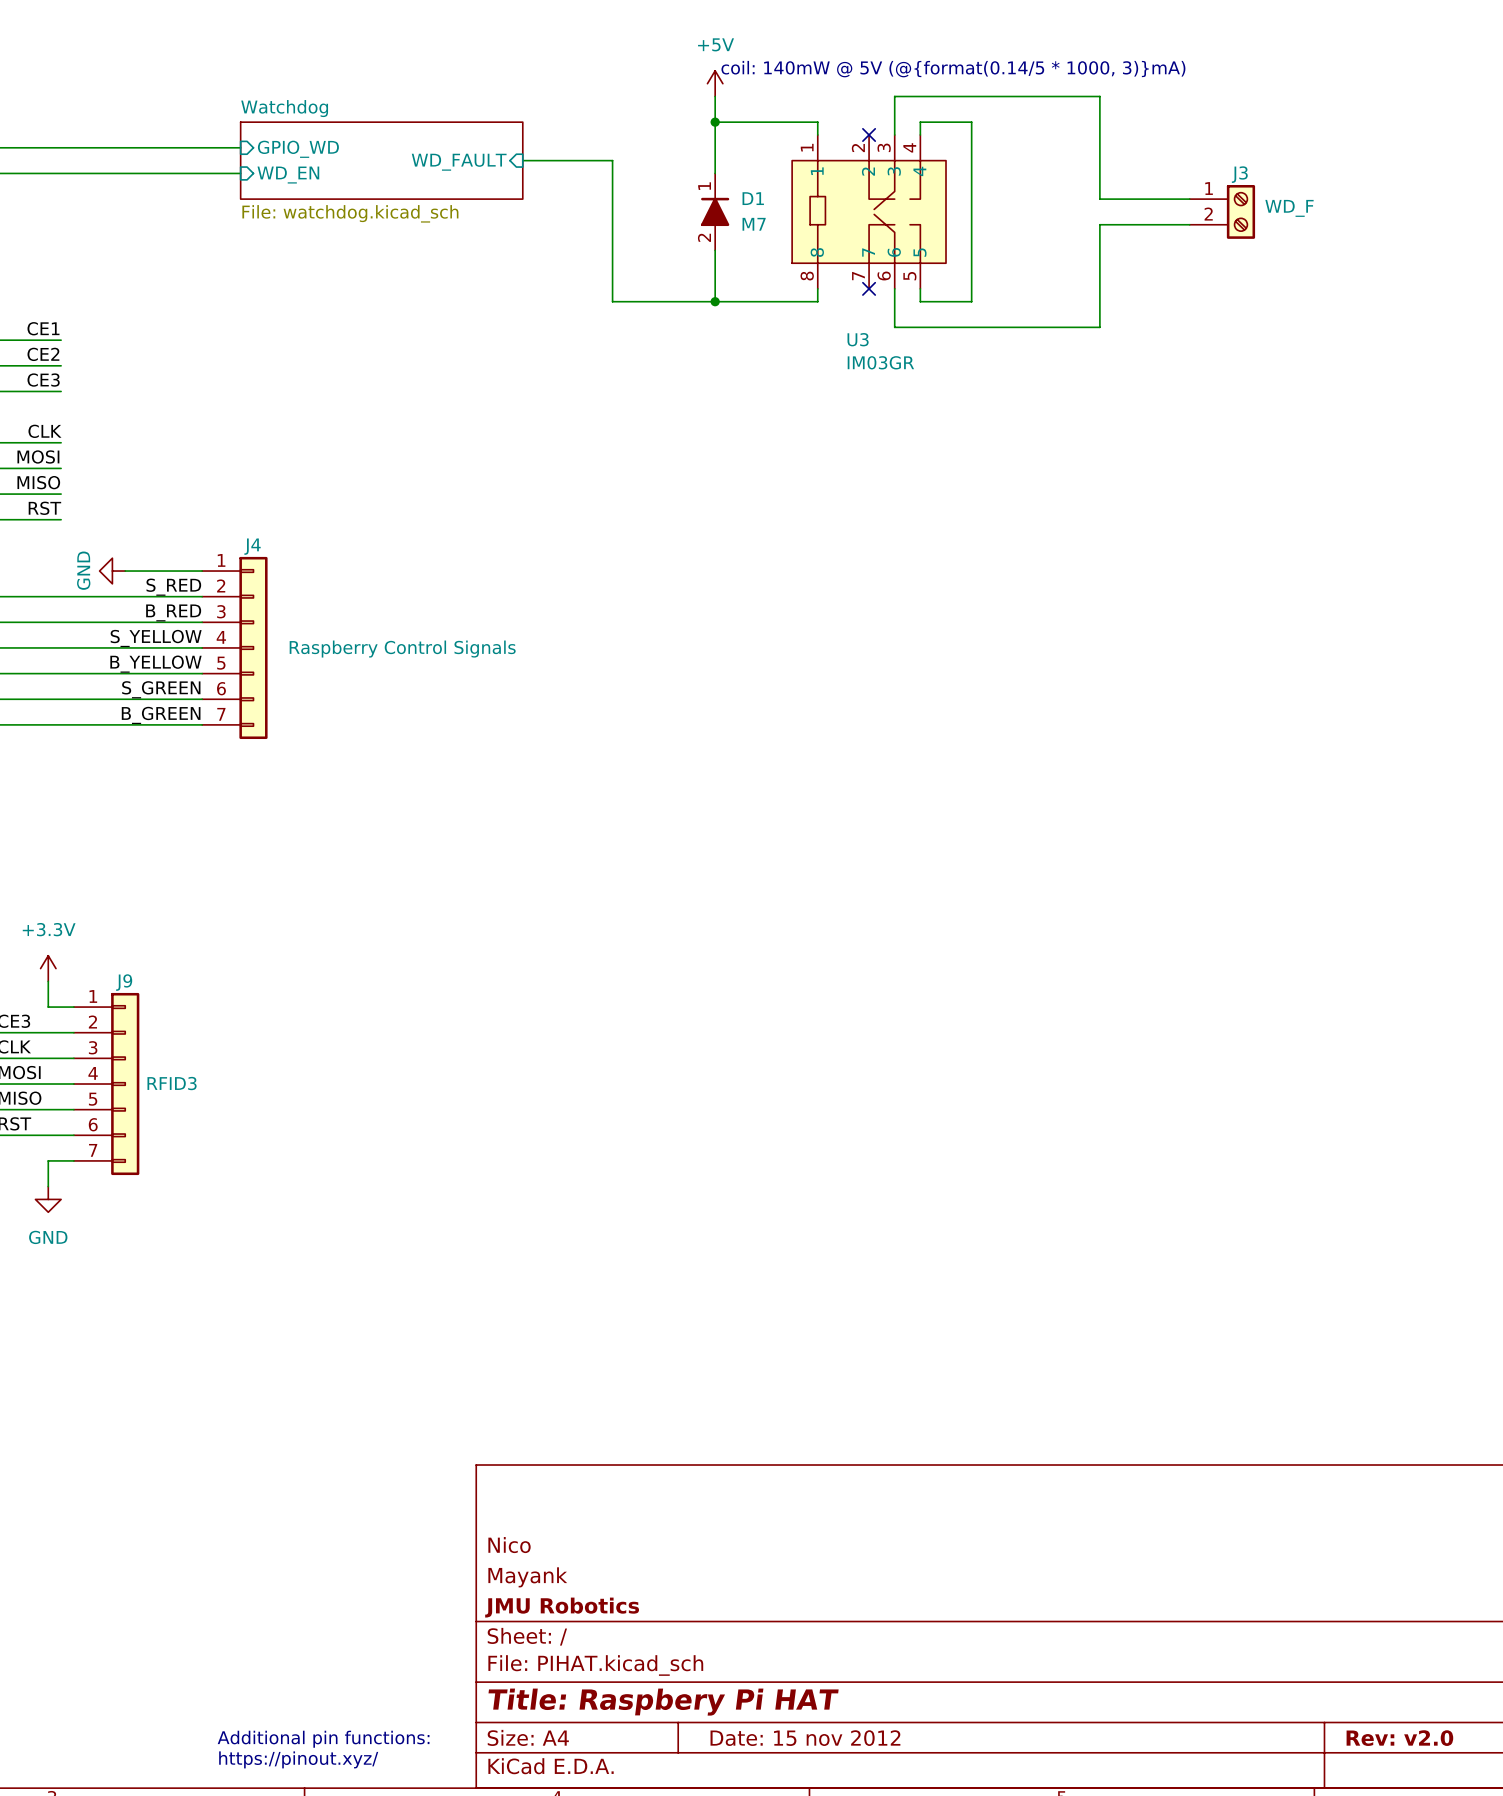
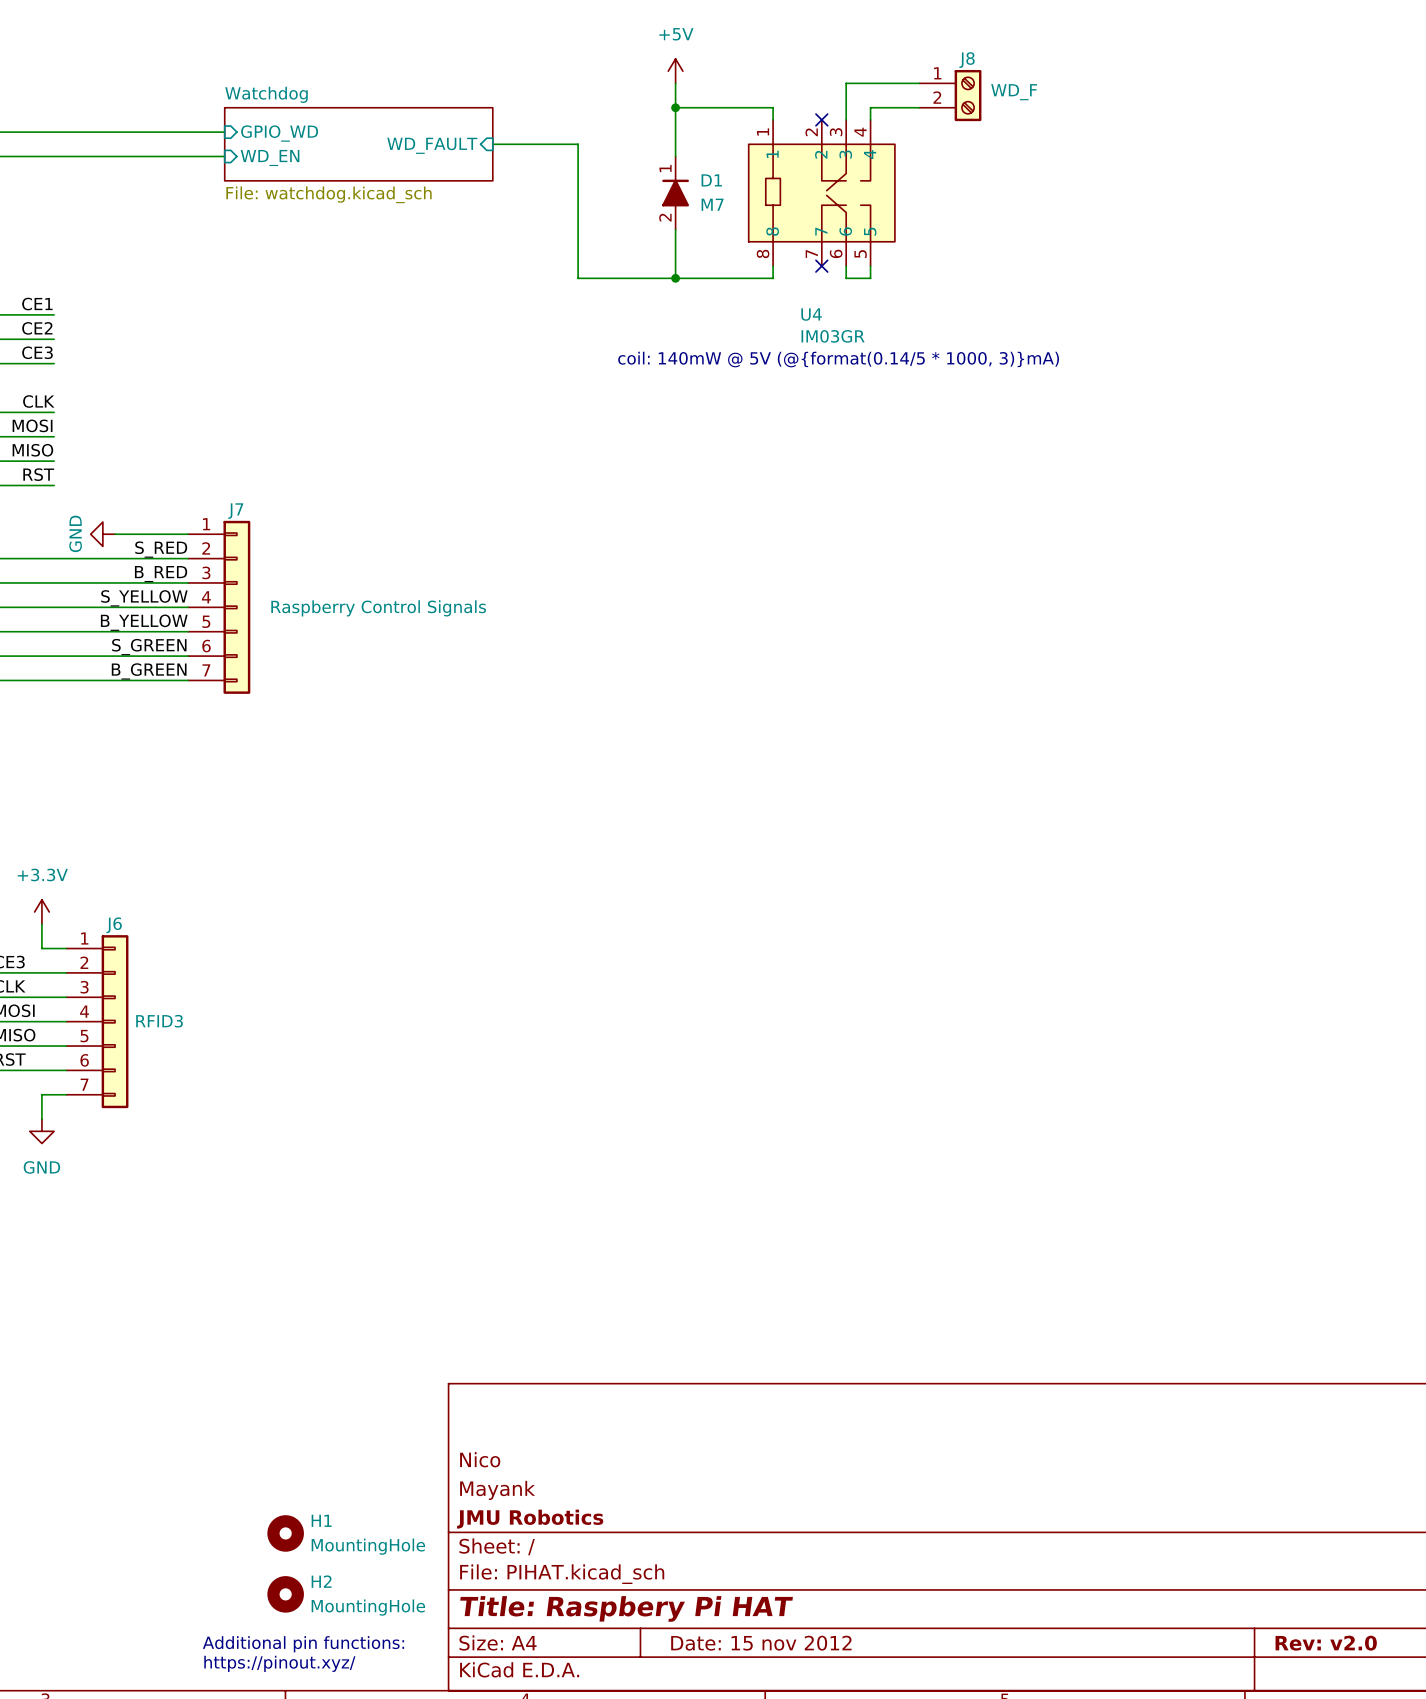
text: coil: 140mW @ 5V (@{format(0.14/5 * 1000, 3)}mA) (953, 69) -> none
wire: (971, 96) (1099, 96) (1099, 199) (1189, 199) -> none
J8: none -> WD_F (950, 95)
wire: (971, 122) (971, 301) (920, 301) -> (846, 278) (870, 278)
J3: WD_F (1222, 211) -> none
wire: (1189, 224) (1099, 224) (1099, 327) (894, 327) (894, 301) -> none
U3 name: U3 (858, 339) -> U4 (811, 314)
text: none -> coil: 140mW @ 5V (@{format(0.14/5 * 1000, 3)}mA) (838, 359)
J4 name: J4 (252, 546) -> J7 (235, 511)
J9 name: J9 (124, 982) -> J6 (114, 925)
H1: none -> MountingHole (285, 1533)
H2: none -> MountingHole (285, 1594)

